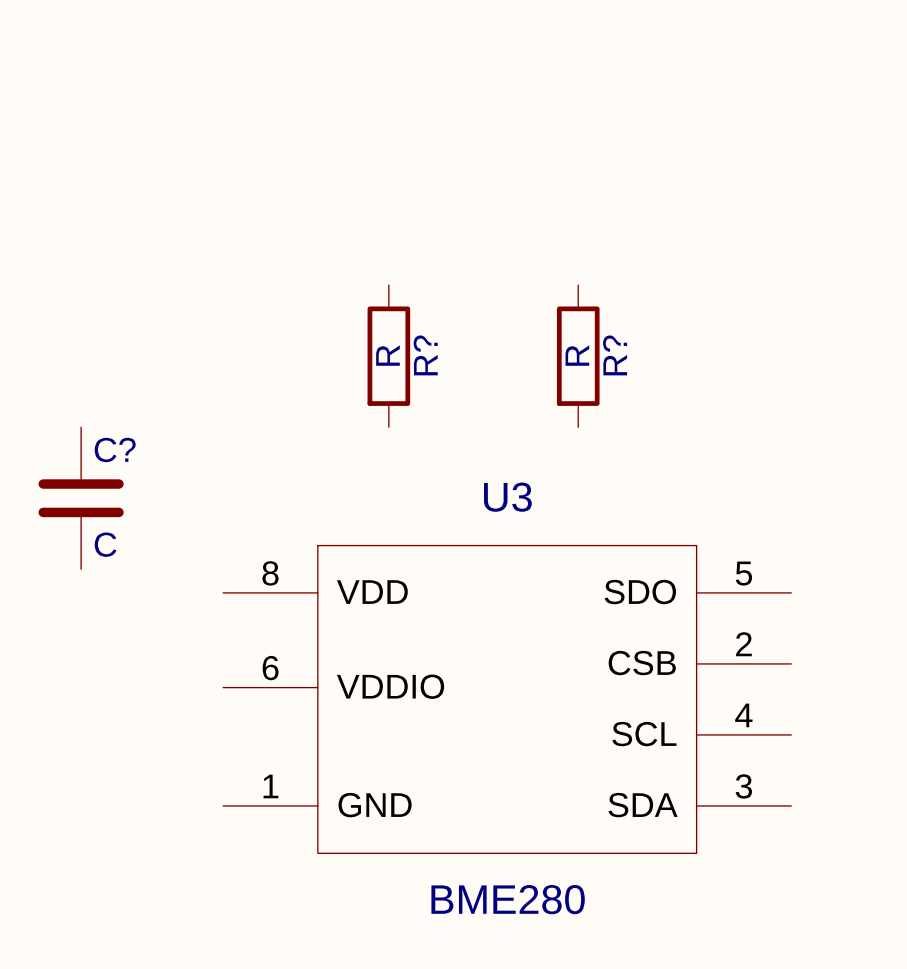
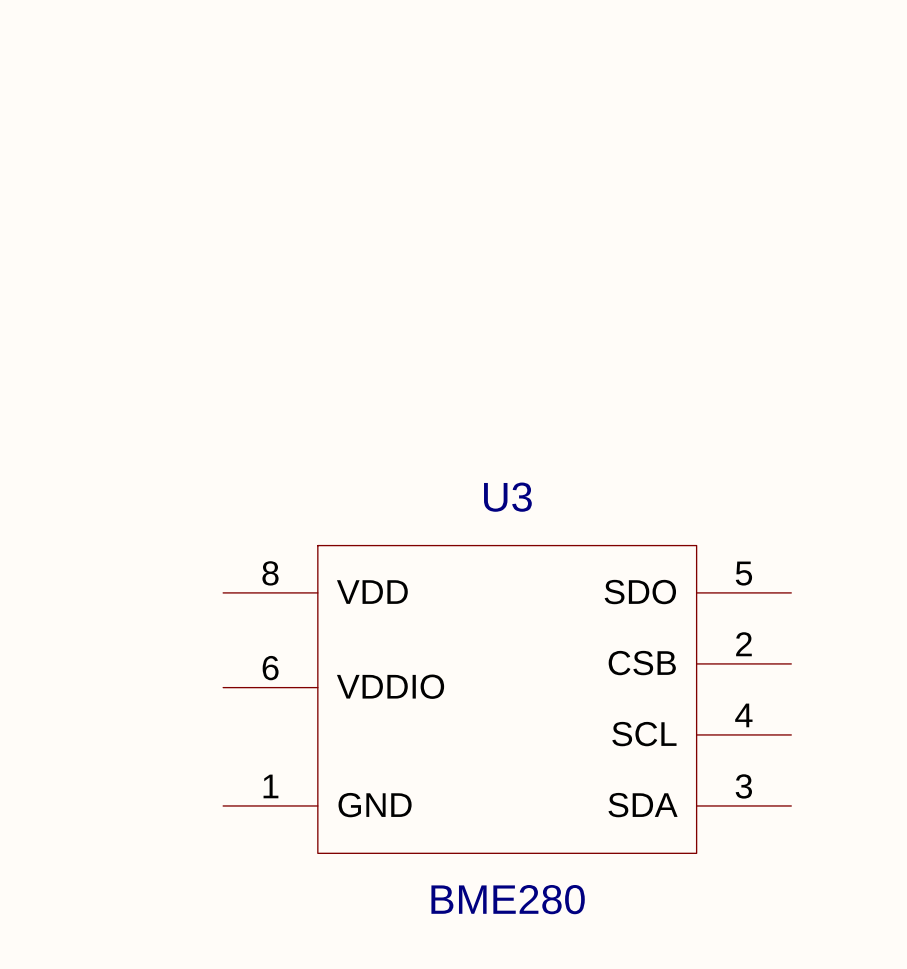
R?: R (388, 356) -> none
R?: R (578, 356) -> none
C?: C (81, 498) -> none

